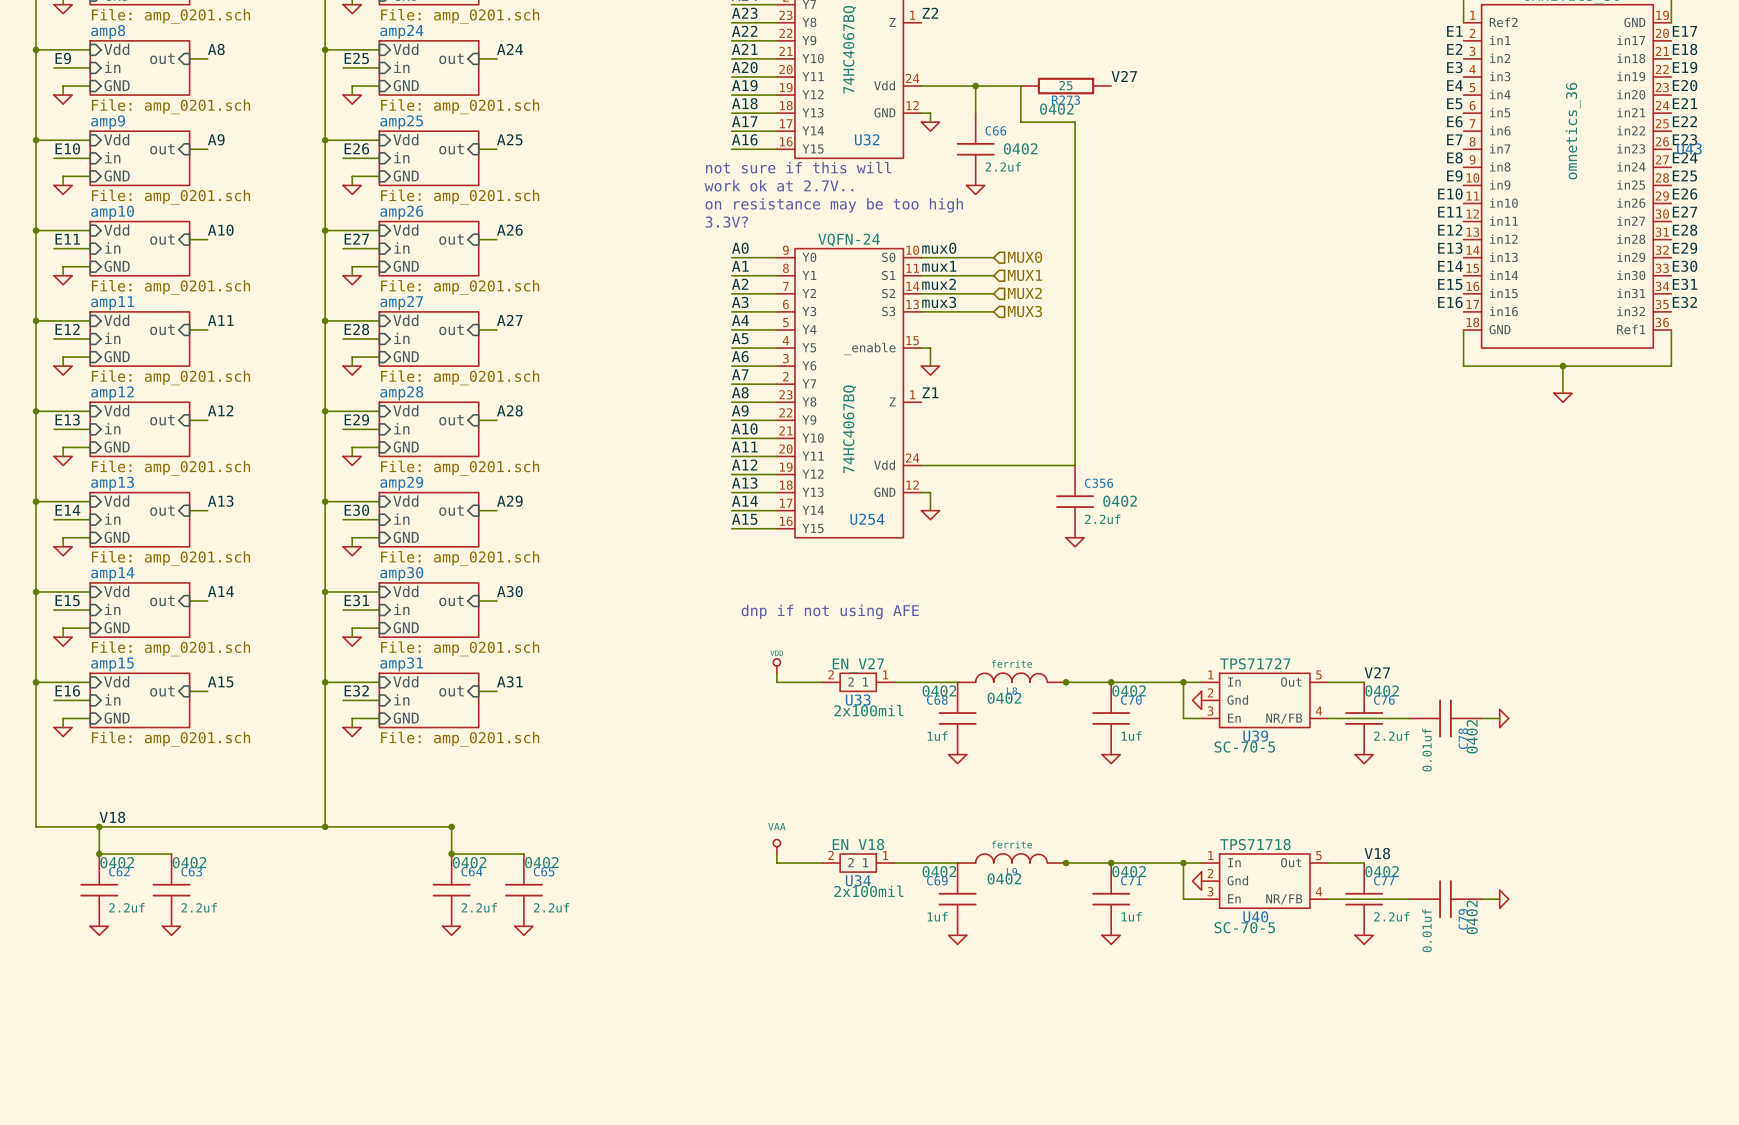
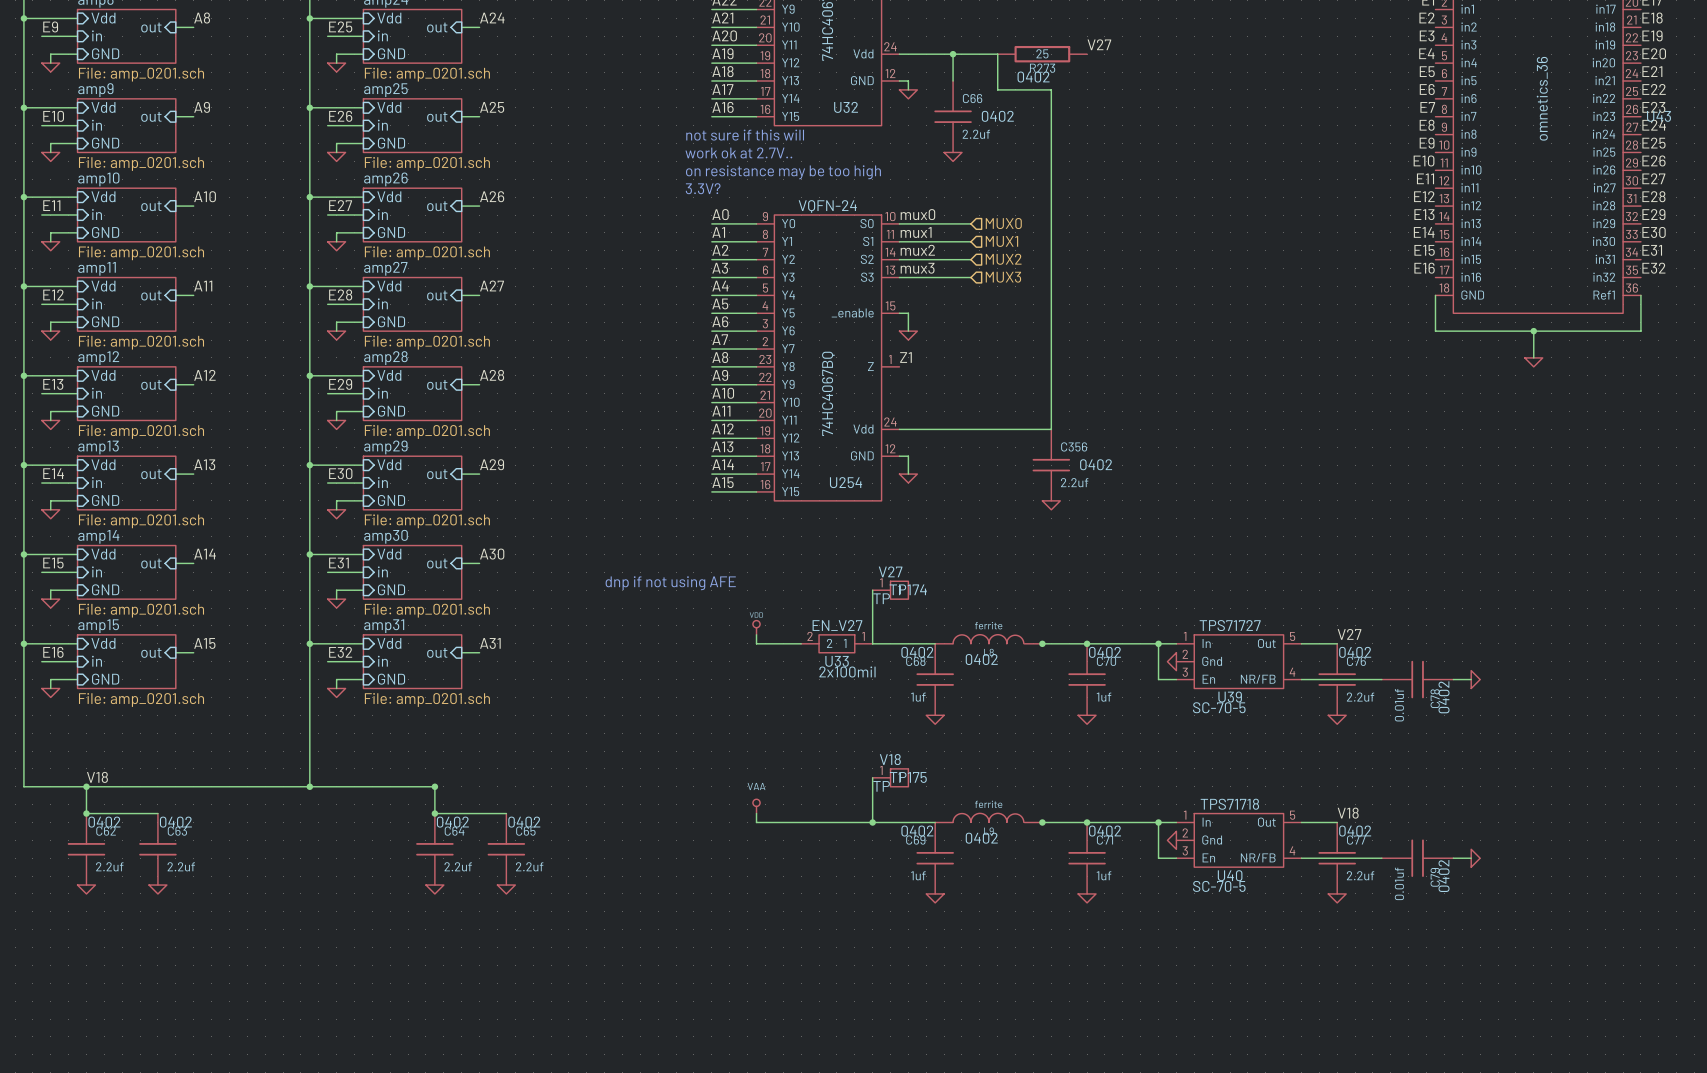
text position: dnp if not using AFE (830, 611) -> dnp if not using AFE (670, 583)
wire: none -> (872, 590) (872, 643)
TP174: none -> V27 (890, 590)
wire: none -> (872, 777) (872, 822) (801, 822)
TP175: none -> V18 (890, 777)
U34: EN_V18 (858, 863) -> none
junction: none -> (872, 822)

